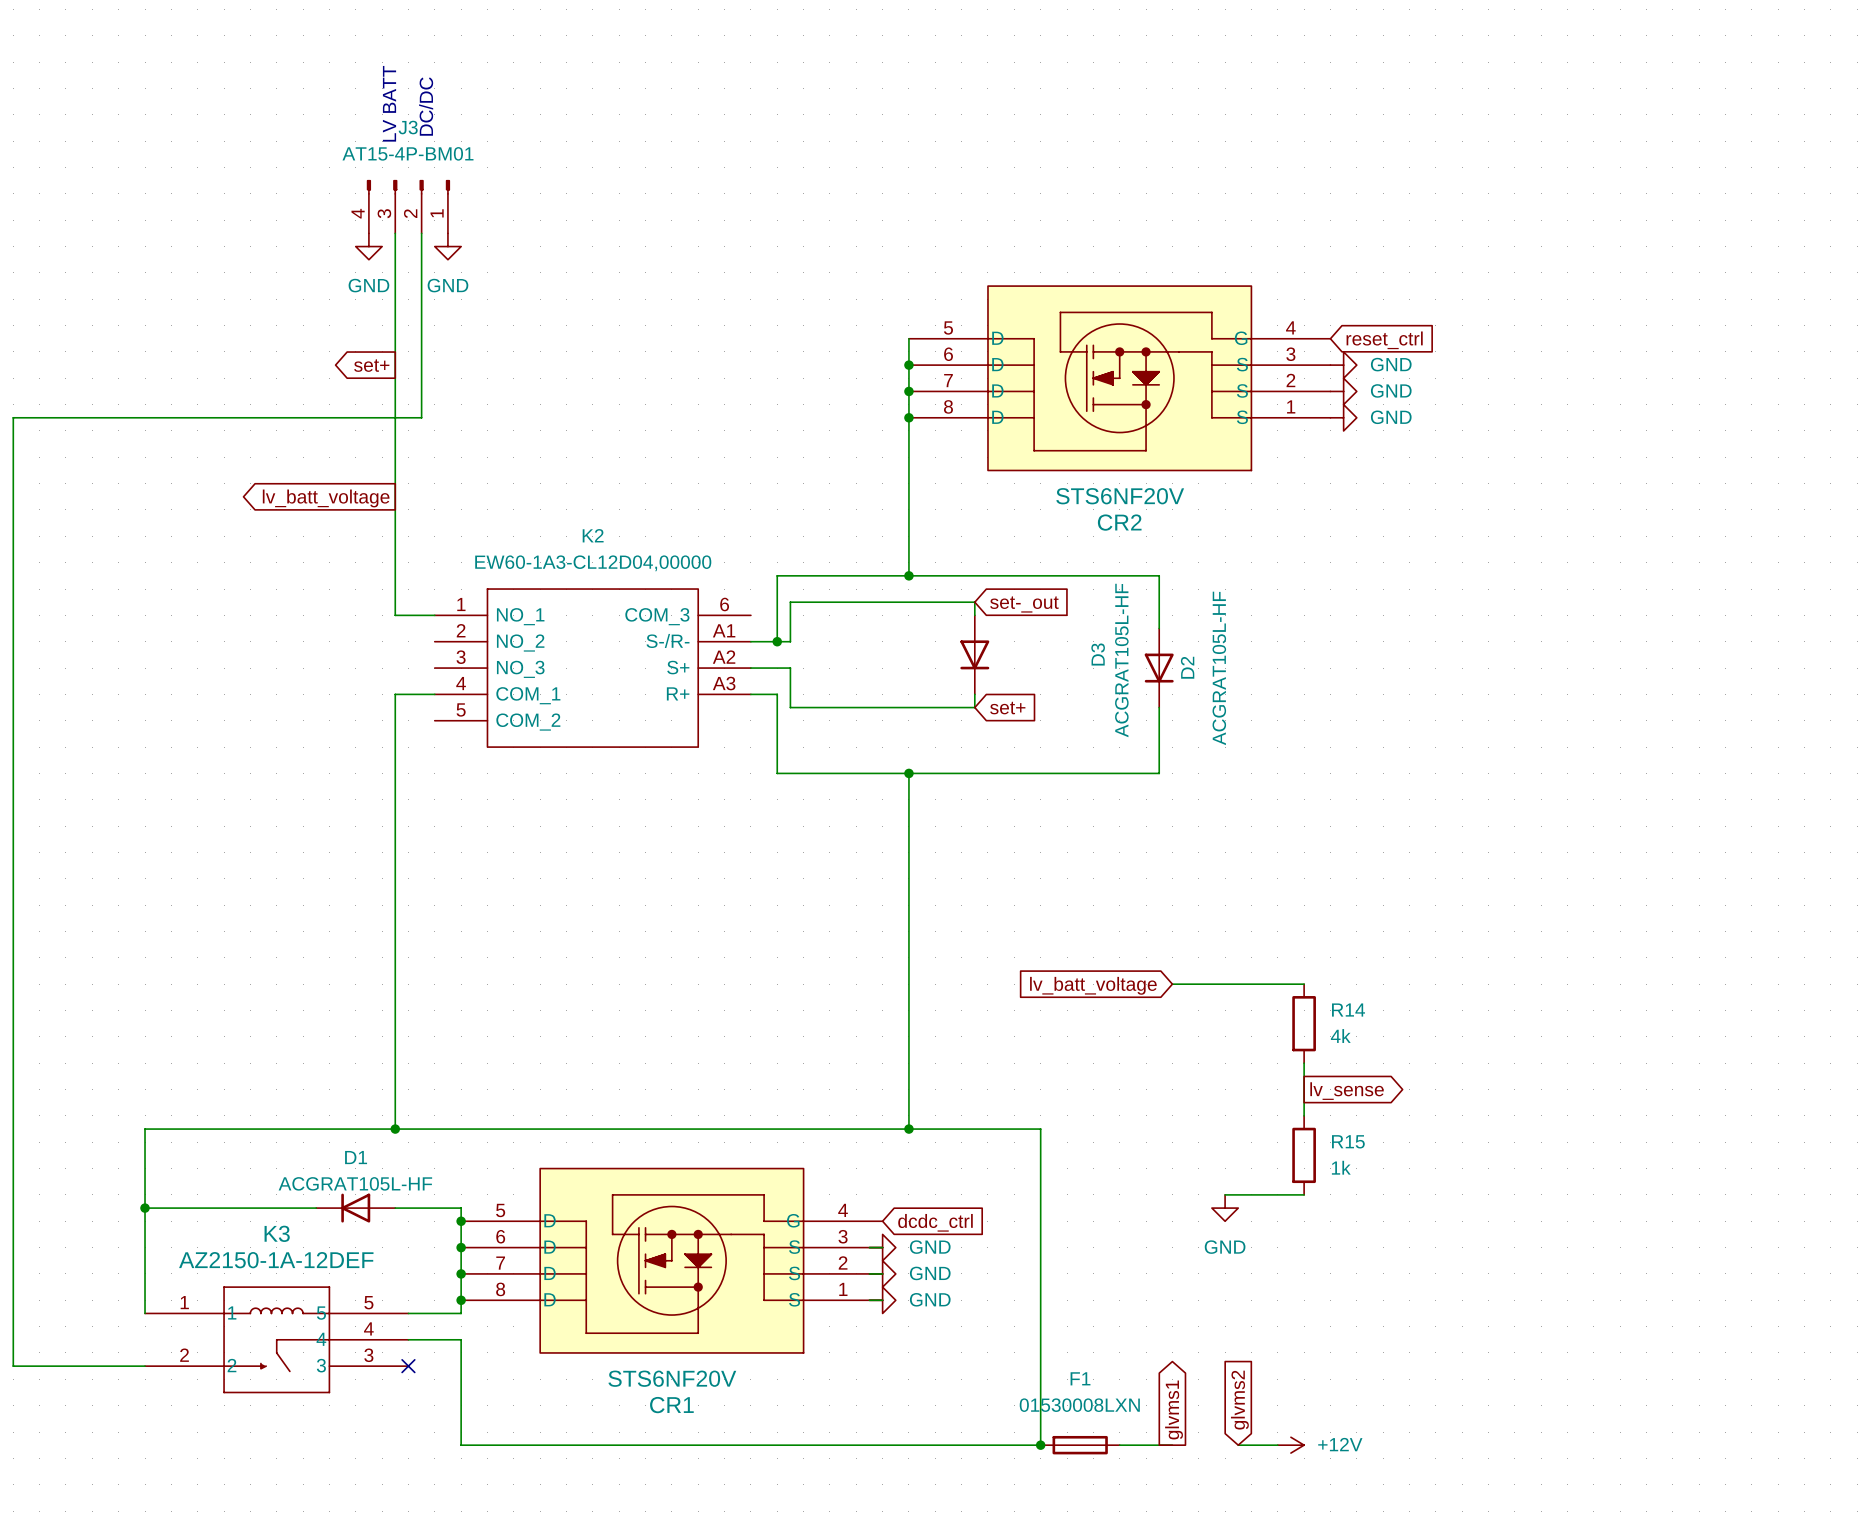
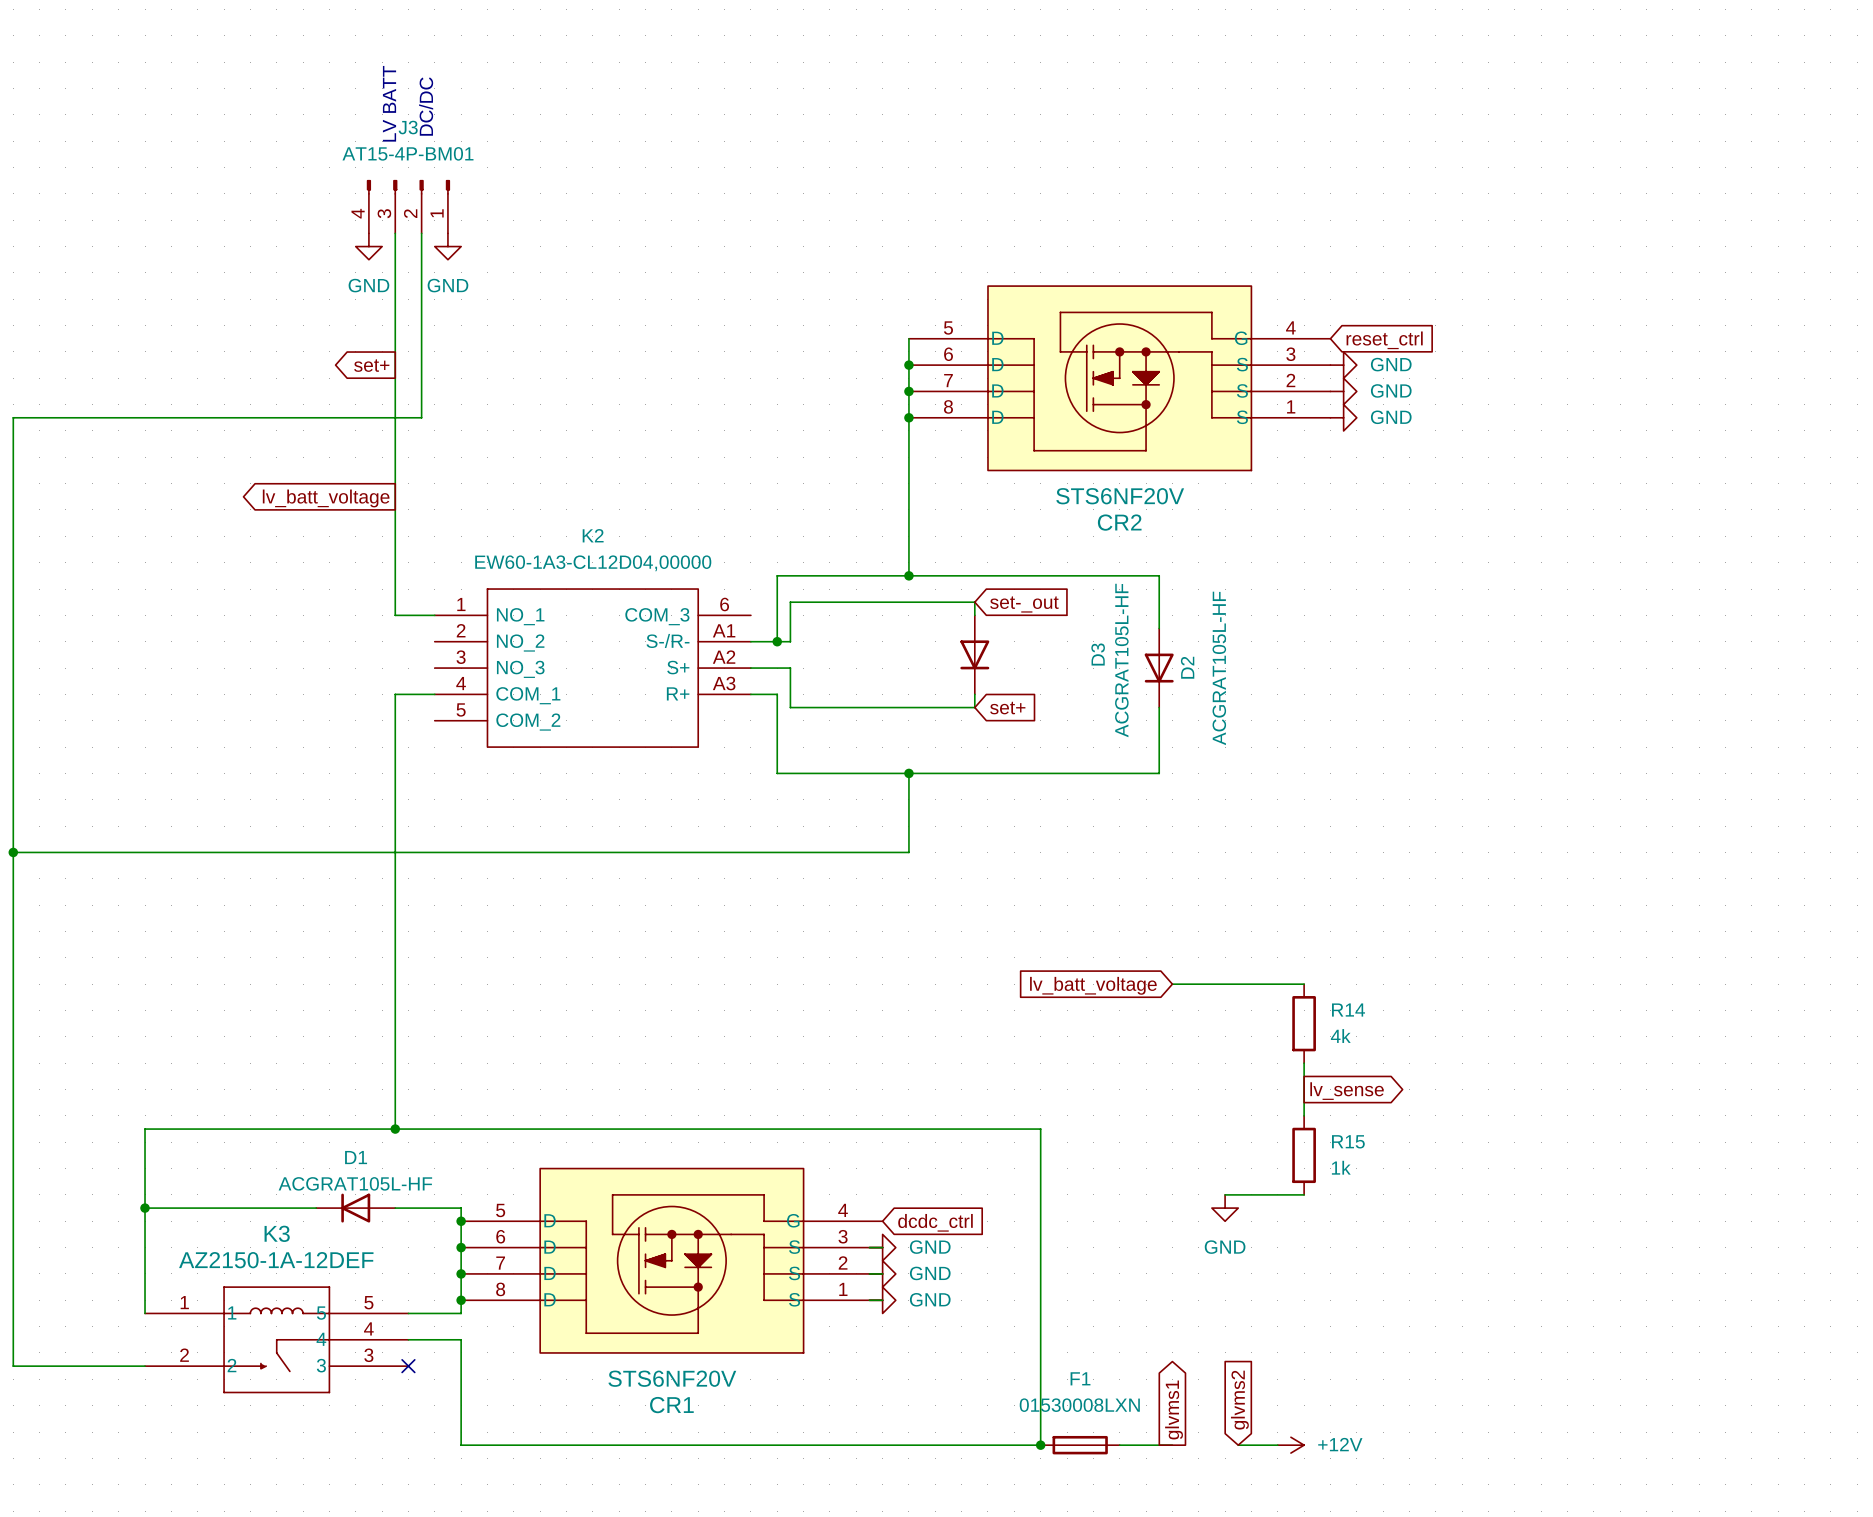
junction: none -> (13, 852)
wire: (908, 852) (908, 1129) -> (908, 852) (13, 852)
junction: (908, 1129) -> none

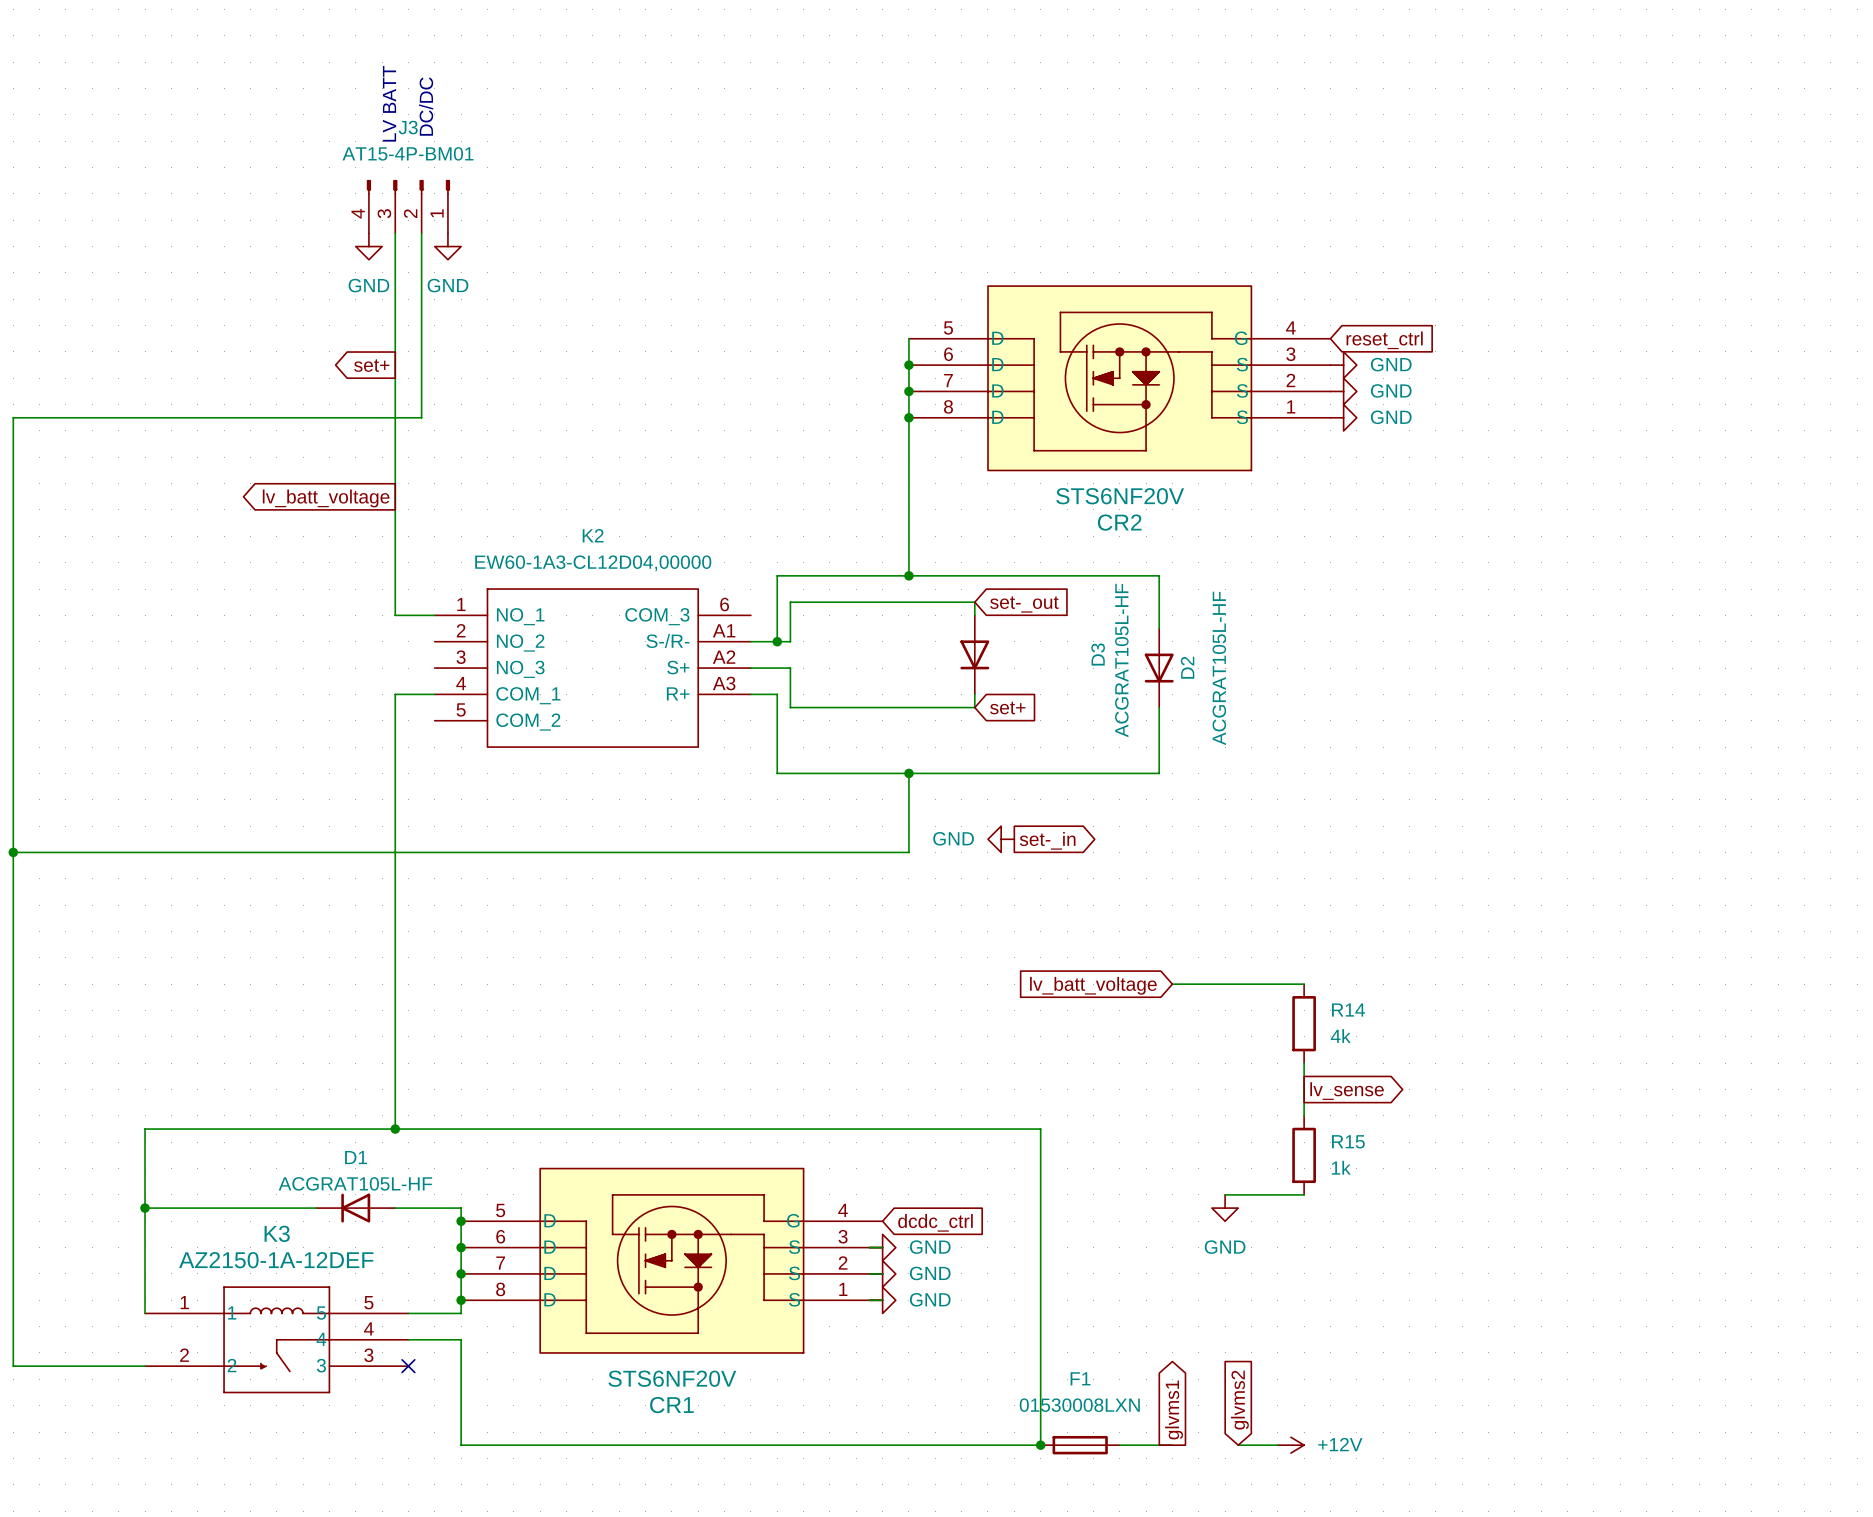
power symbol: none -> GND (1001, 839)
global label: none -> set-_in (1047, 840)

